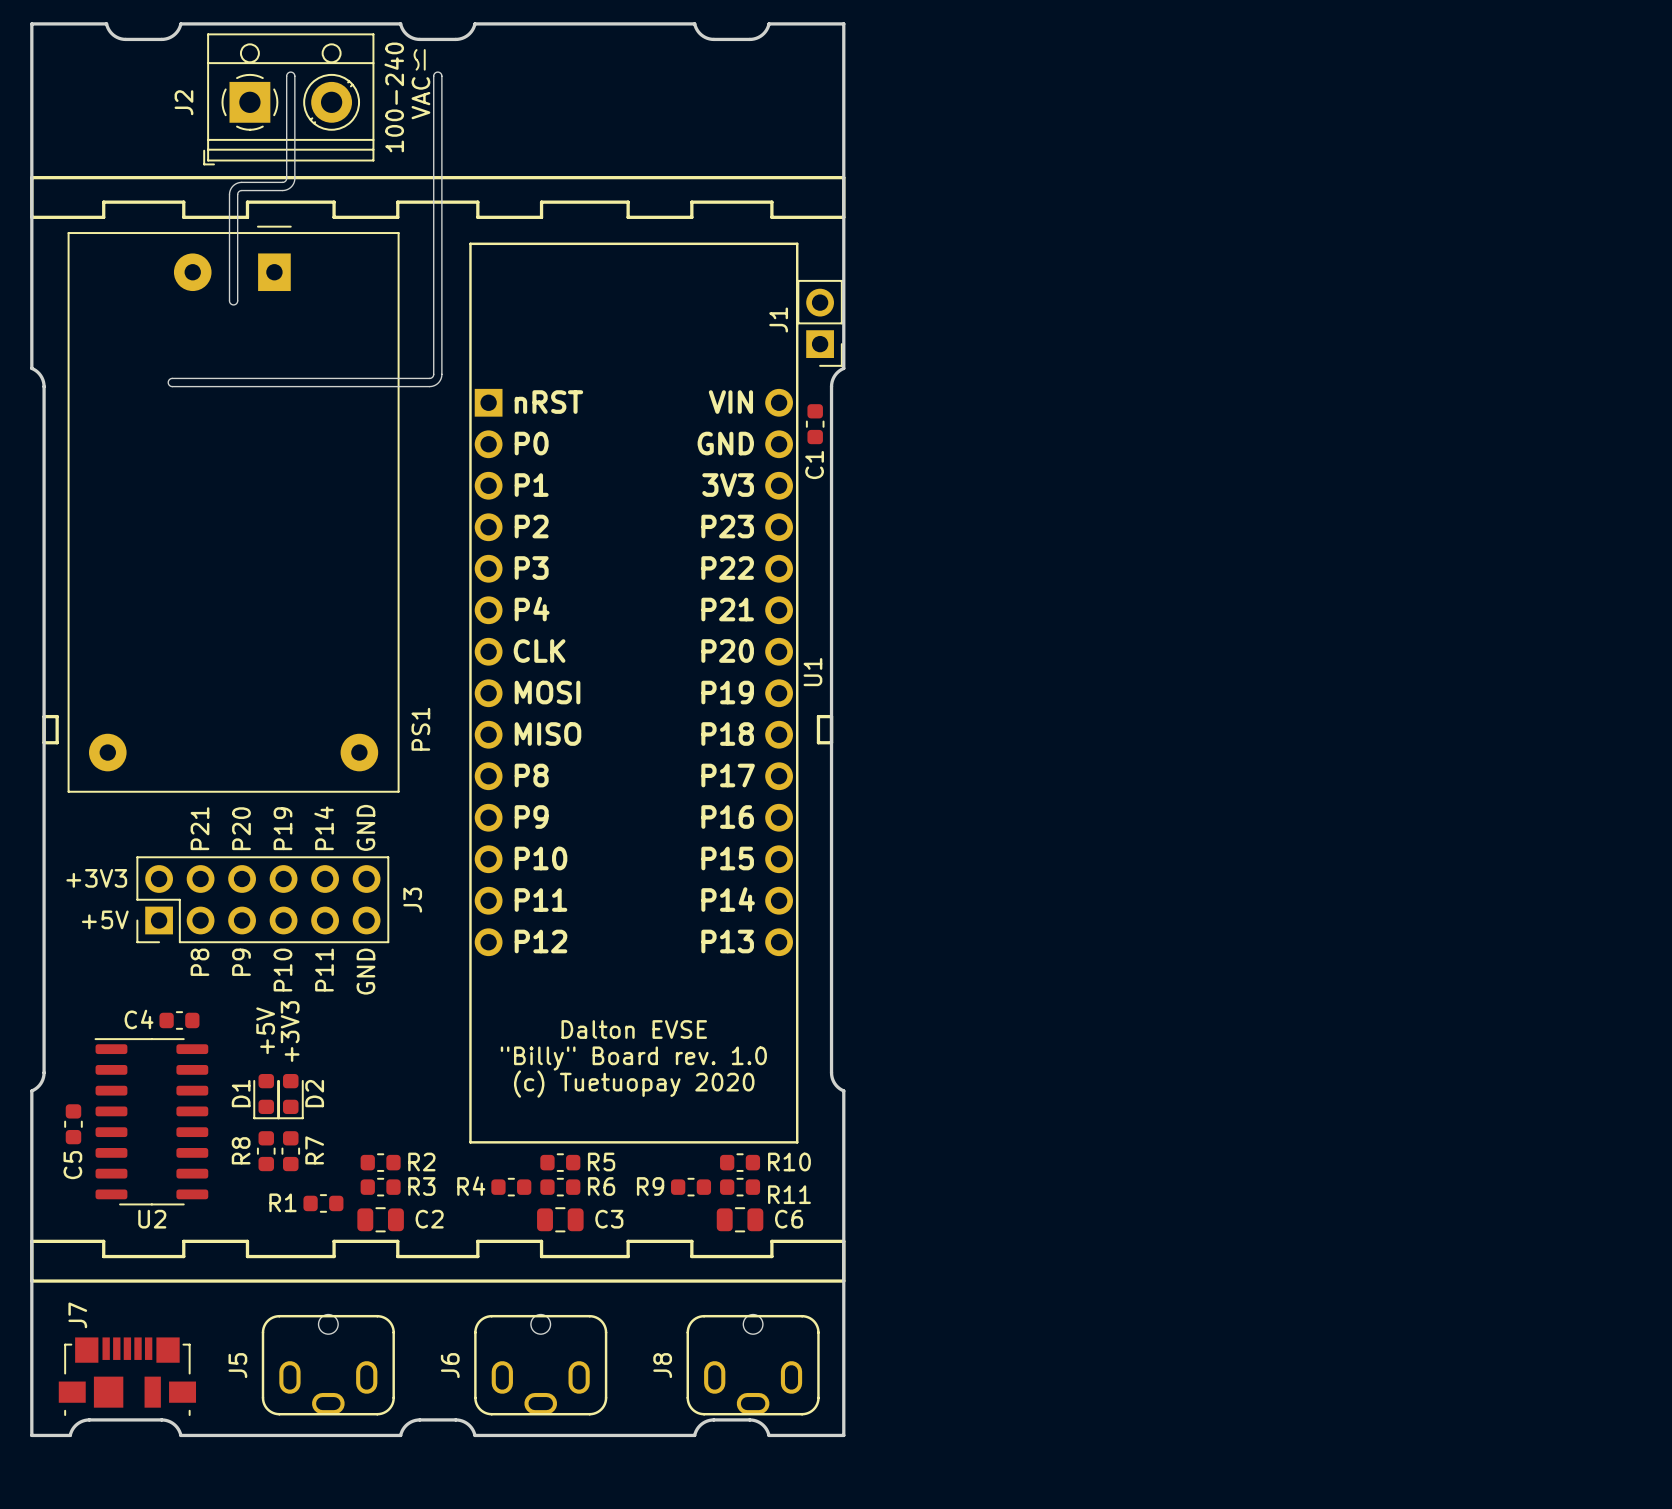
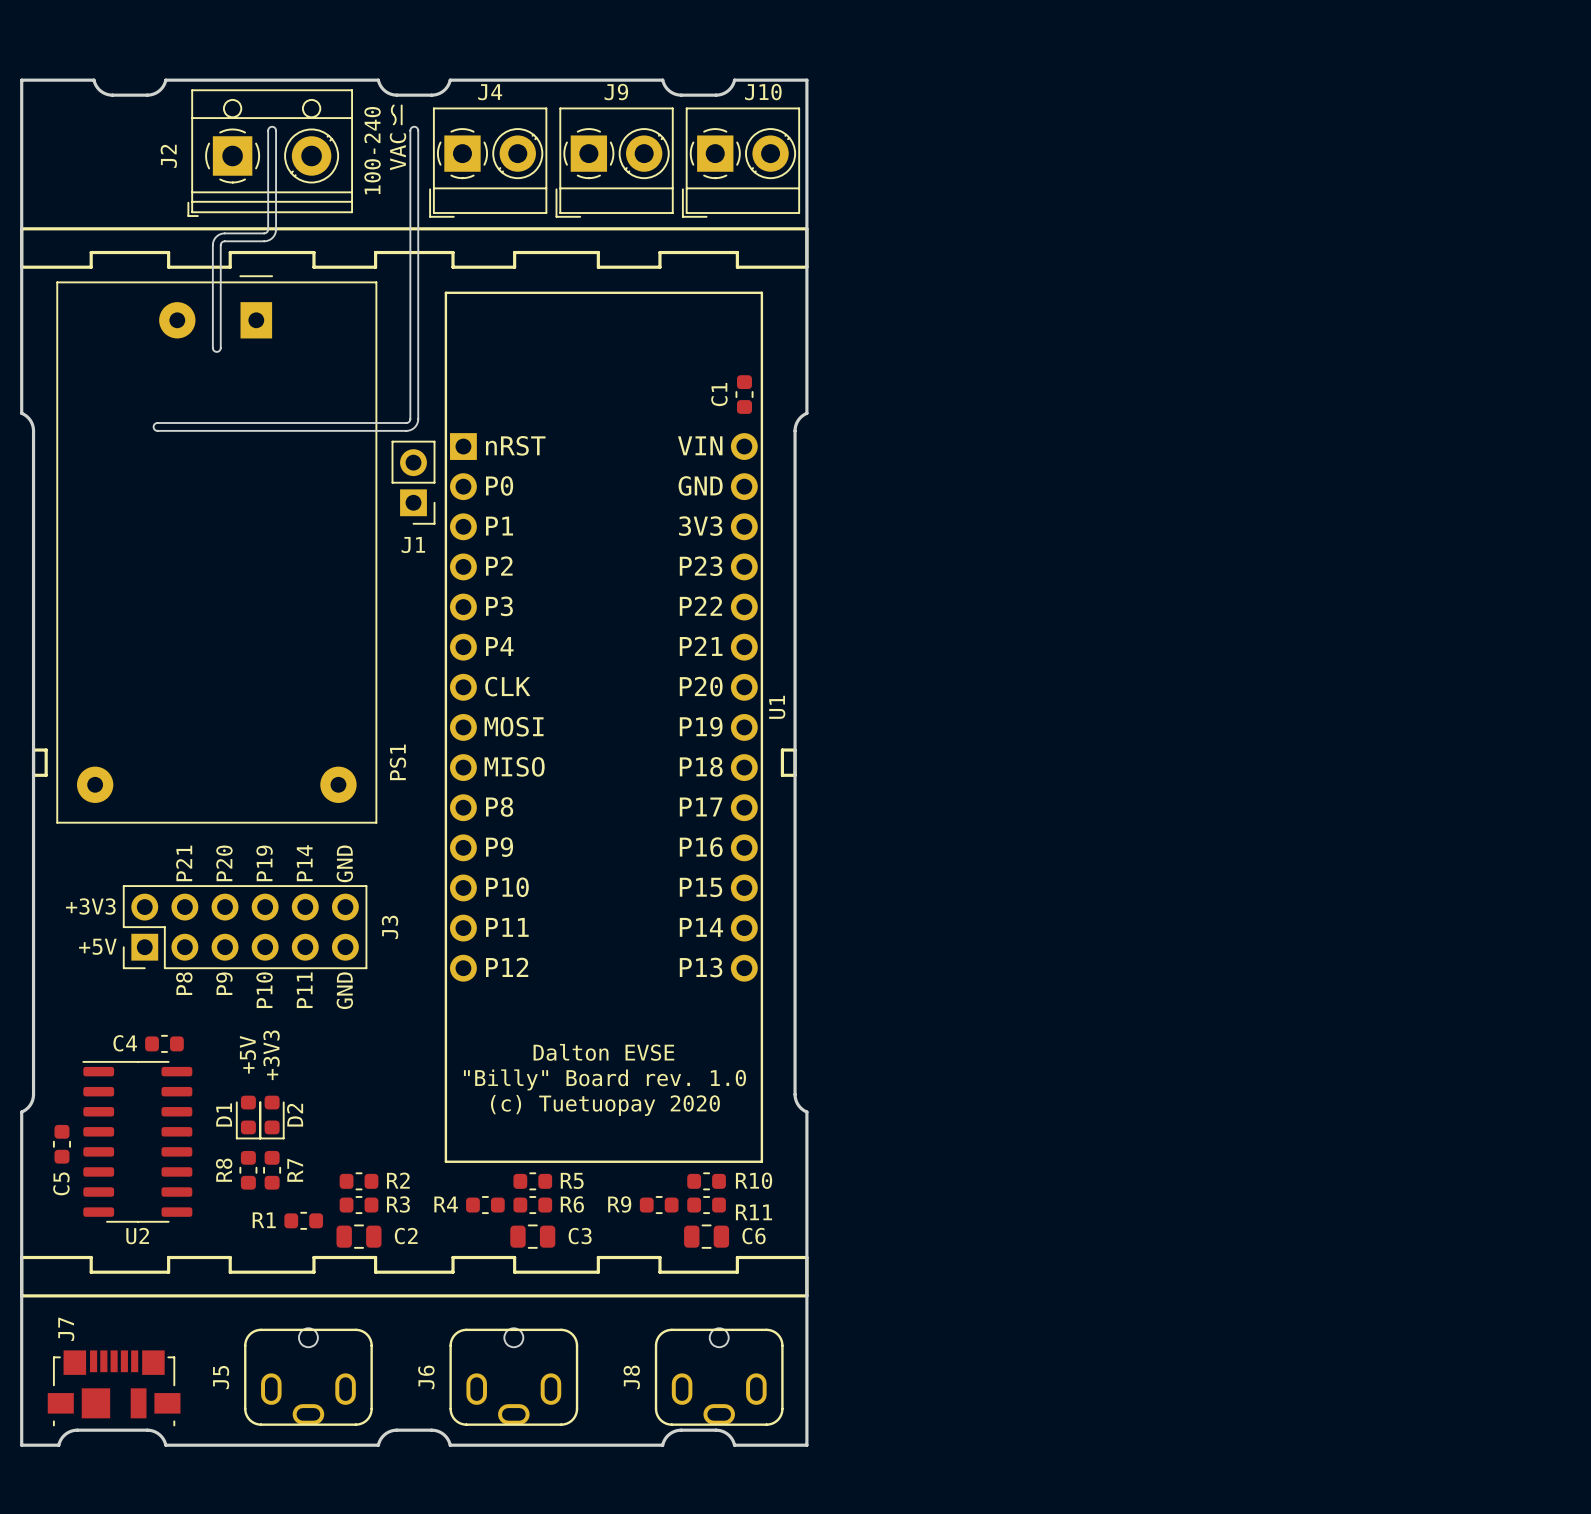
J4: none -> (488, 162)
J9: none -> (614, 162)
J10: none -> (741, 162)
J1 name rotation: 0° (778, 320) -> 90° clockwise (413, 544)
J1 name position: J1 (778, 320) -> J1 (413, 544)
J1 position: (820, 323) -> (413, 482)
C1 position: (815, 424) -> (744, 394)
C1 name position: C1 (814, 465) -> C1 (719, 394)

